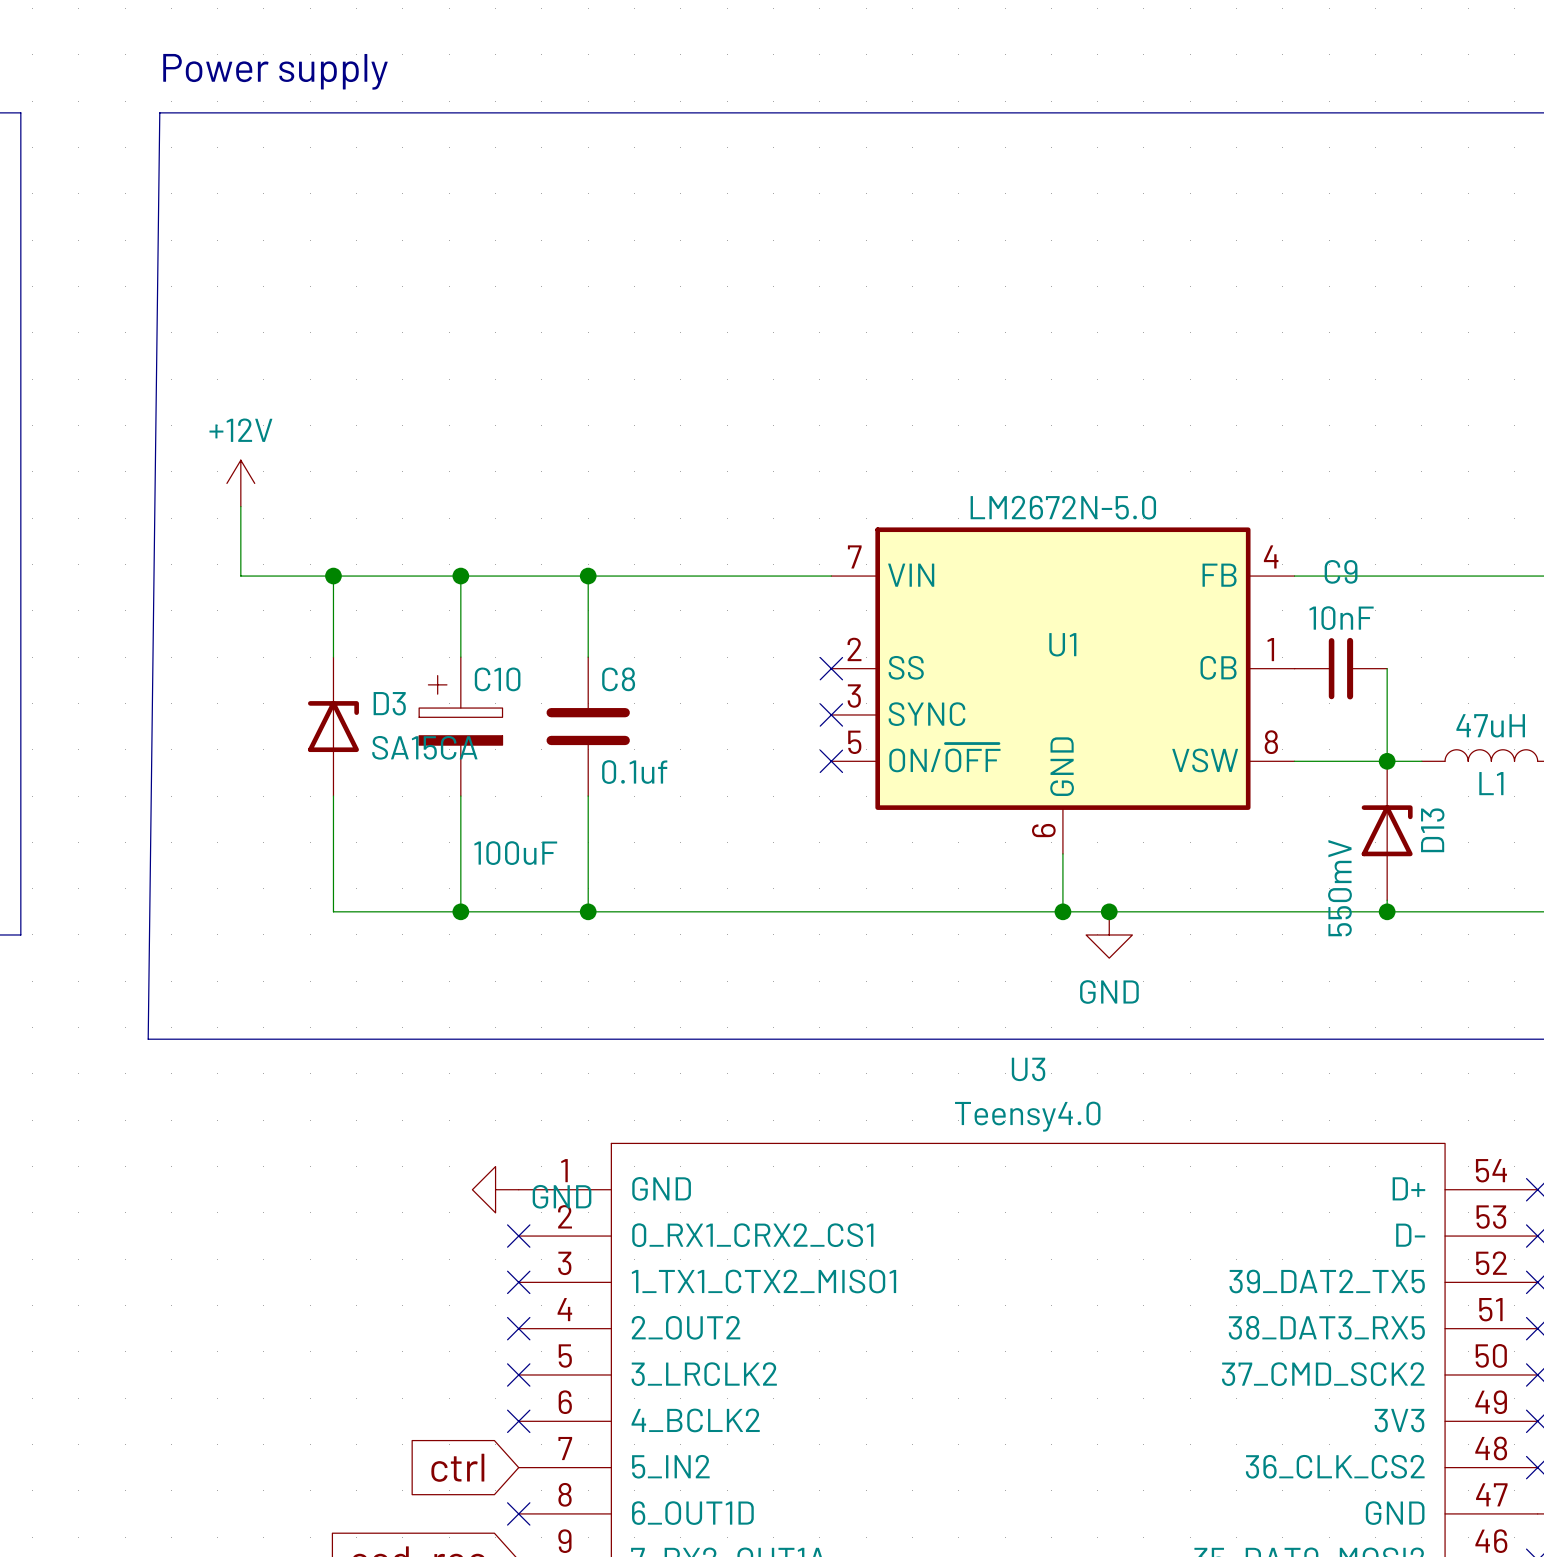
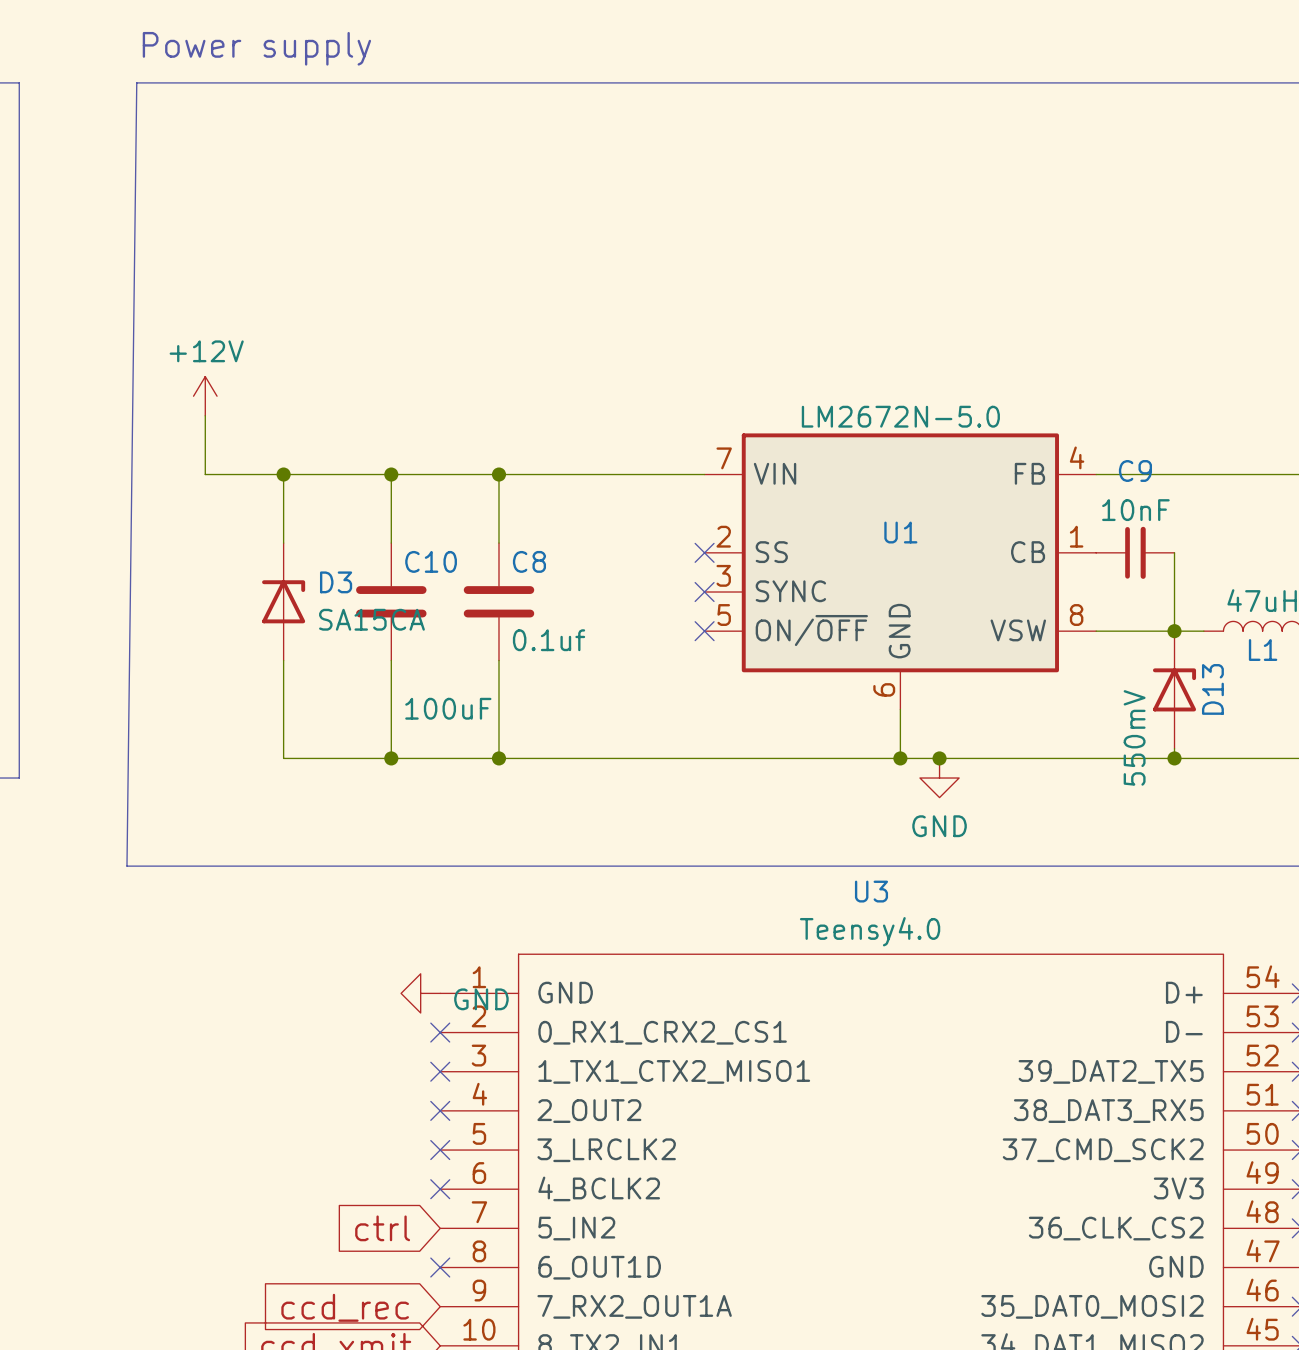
C10 symbol: [419, 657, 503, 797] -> [356, 543, 427, 661]

